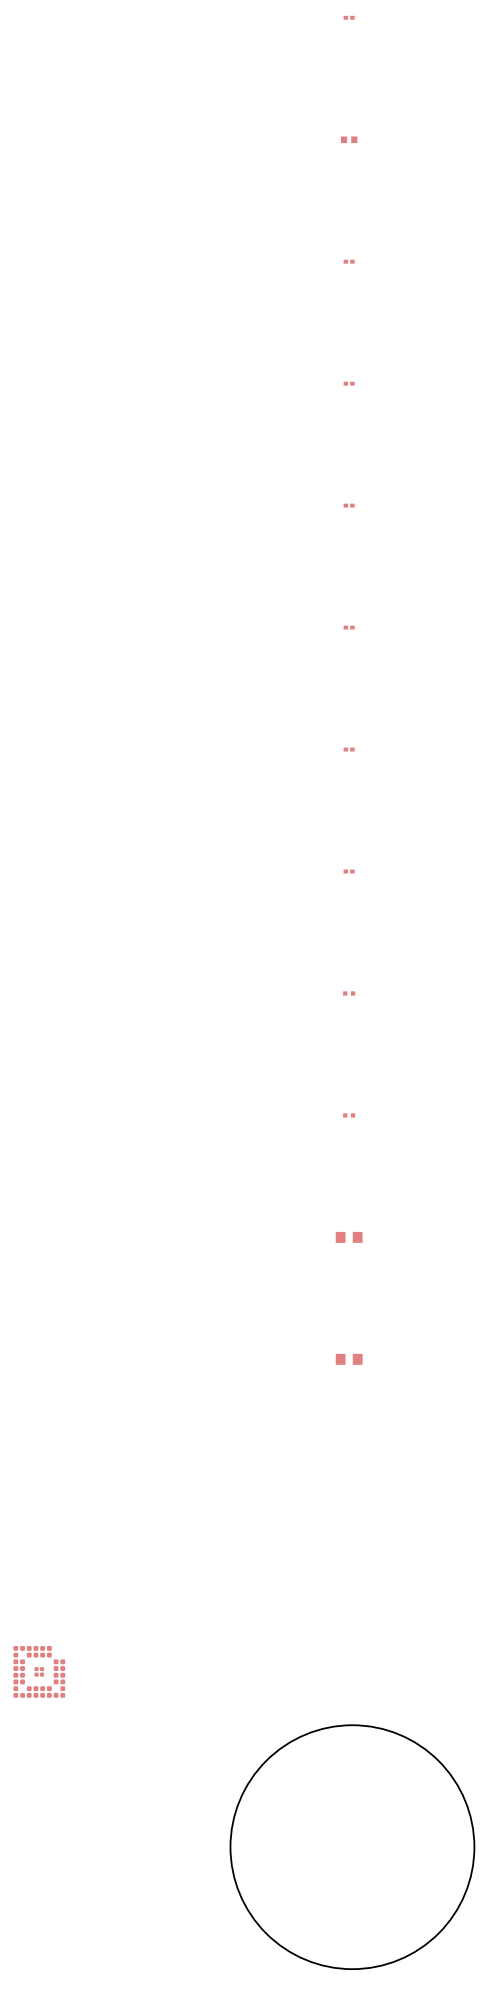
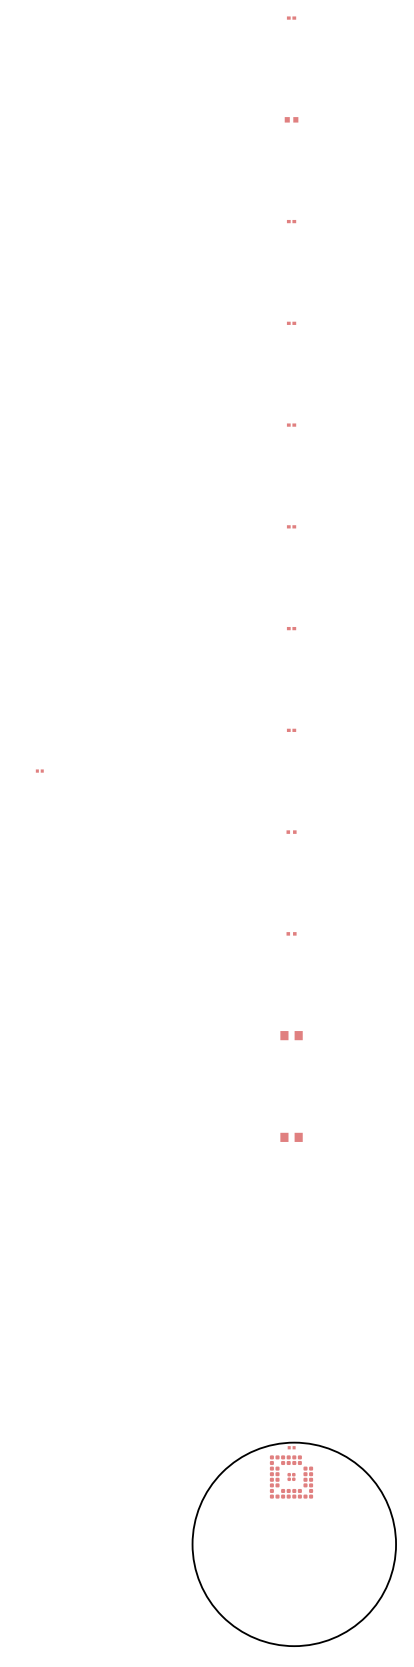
part: none -> (39, 771)
part: (39, 1671) -> none
part: none -> (291, 1447)
part: none -> (291, 1476)

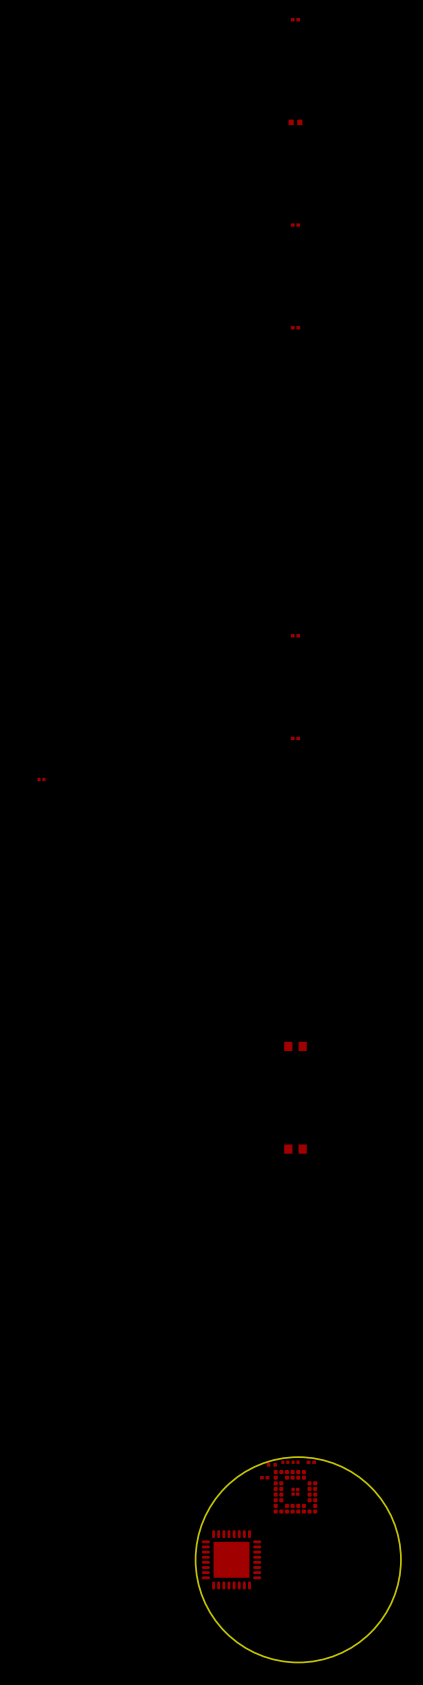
part: (291, 425) -> none
part: (291, 526) -> none
part: (291, 832) -> none
part: (291, 933) -> none
part: none -> (285, 1462)
part: none -> (311, 1462)
part: none -> (271, 1464)
part: none -> (264, 1477)
part: none -> (231, 1559)

